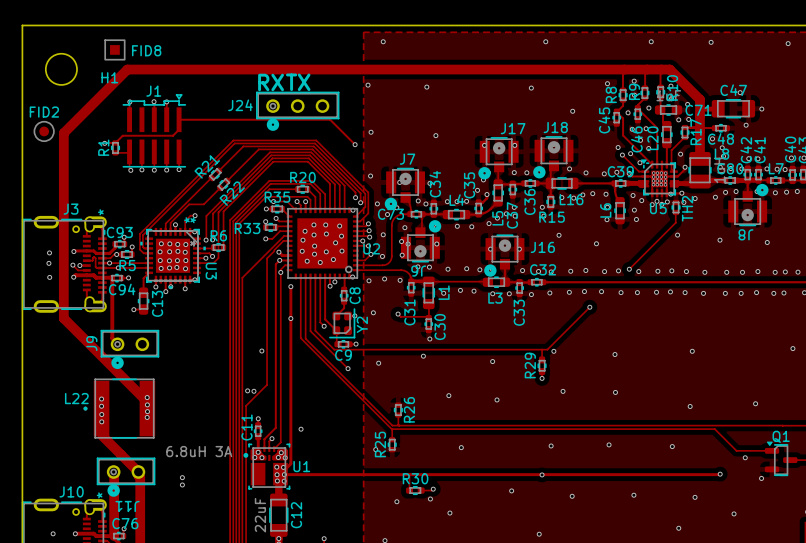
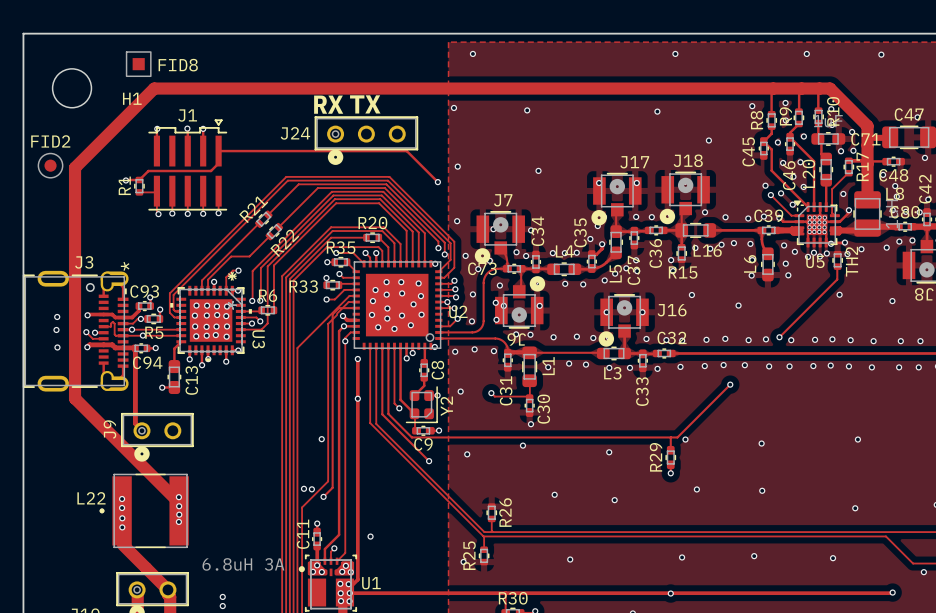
track: none -> (356, 308) (338, 308) (332, 314) (332, 487) (323, 496)
via: none -> (323, 496)

